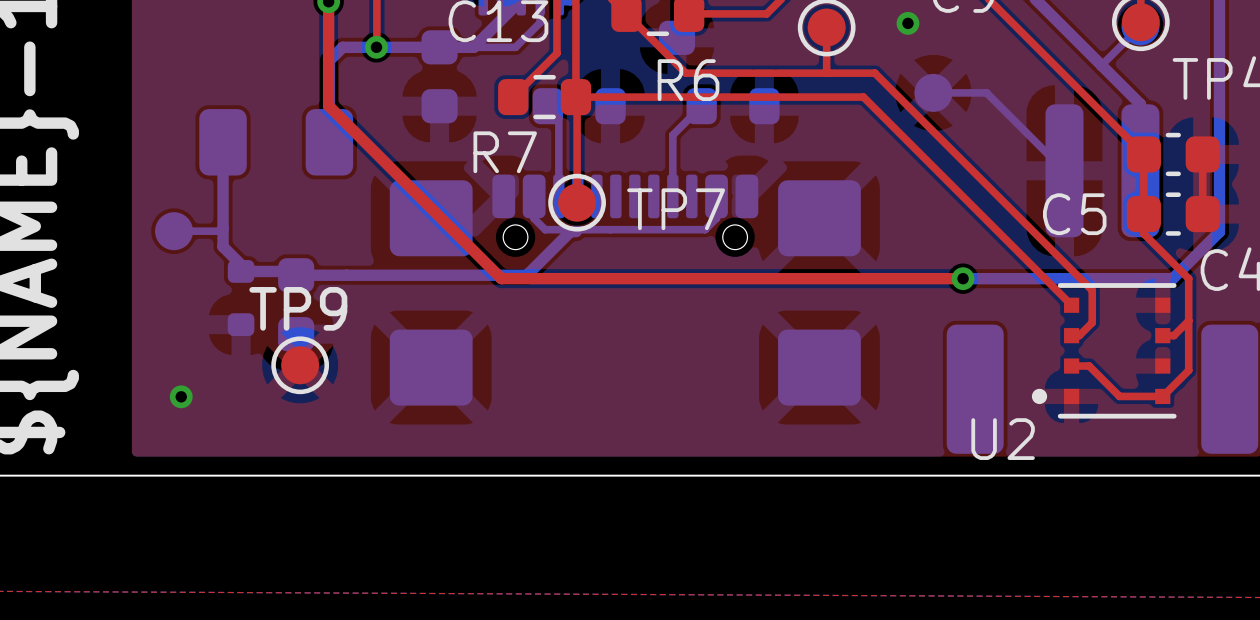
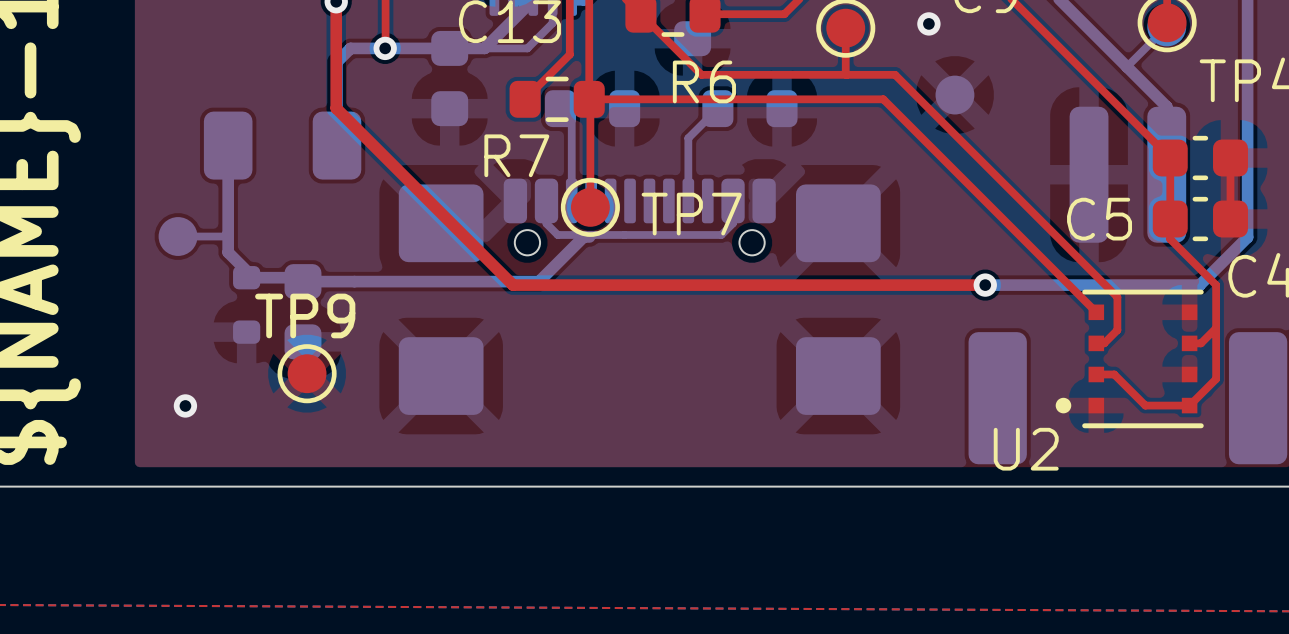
bottom track: (933, 92) (986, 92) (1064, 170) -> none

